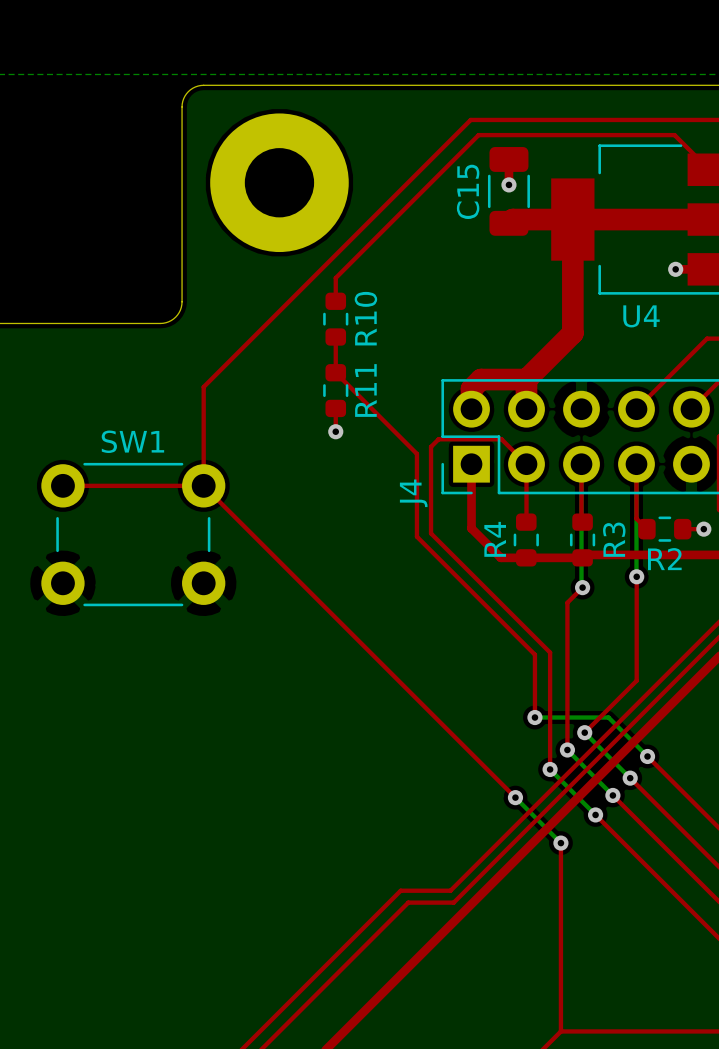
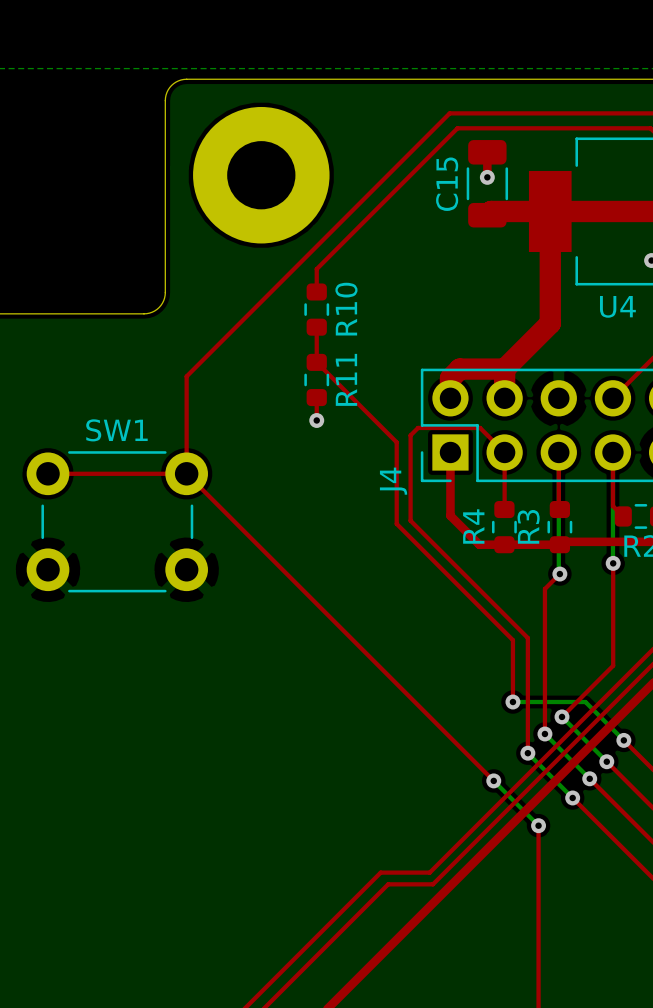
R3 name position: R3 (614, 539) -> R3 (528, 526)

